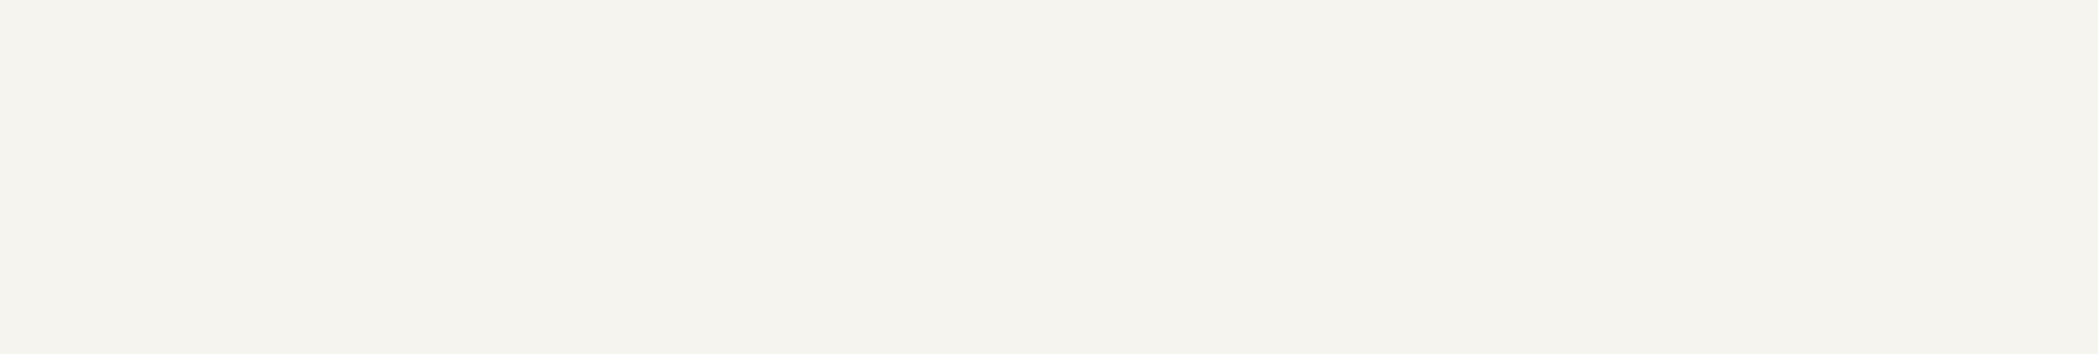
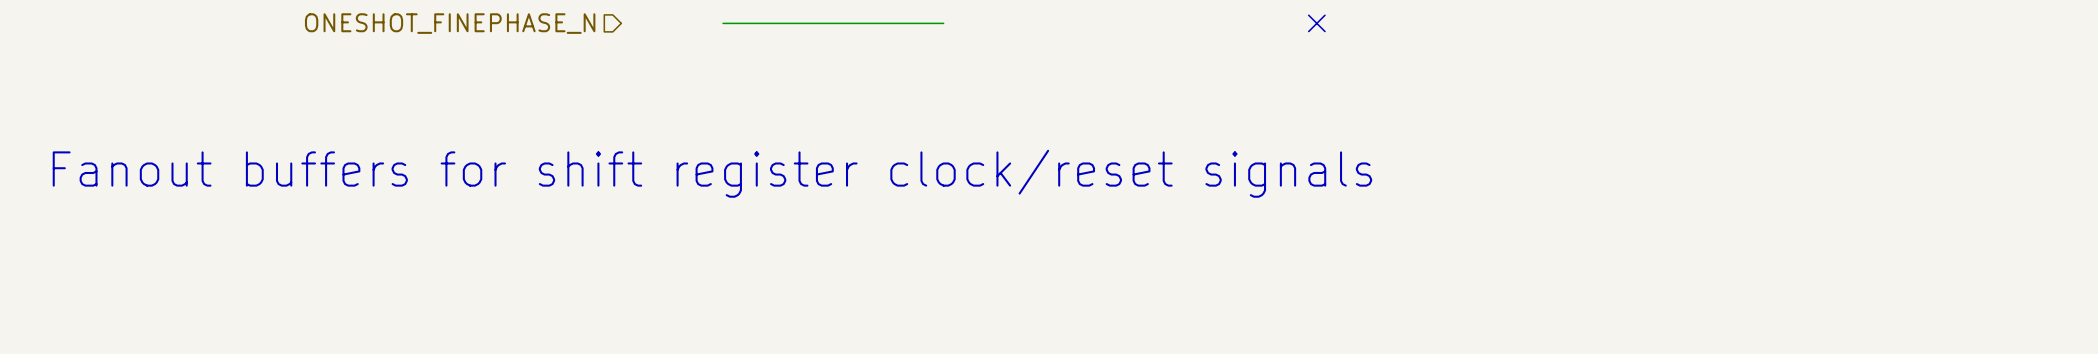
hierarchical label: none -> ONESHOT_FINEPHASE_N (450, 23)
wire: none -> (723, 23) (943, 23)
no-connect mark: none -> (1316, 23)
text: none -> Fanout buffers for shift register clock/reset signals (712, 173)

